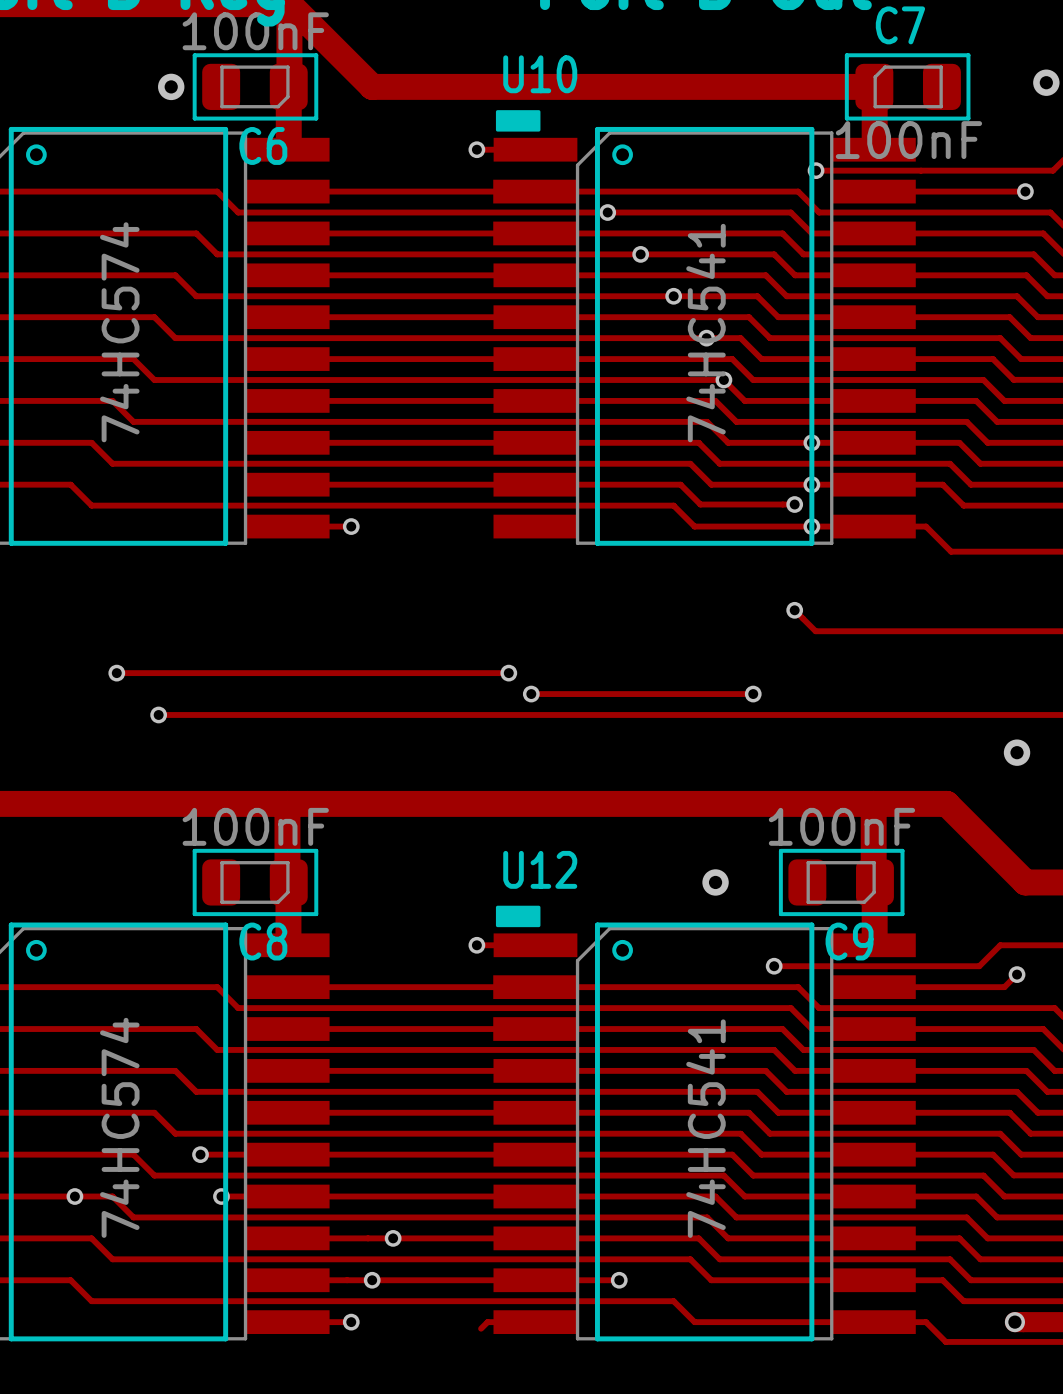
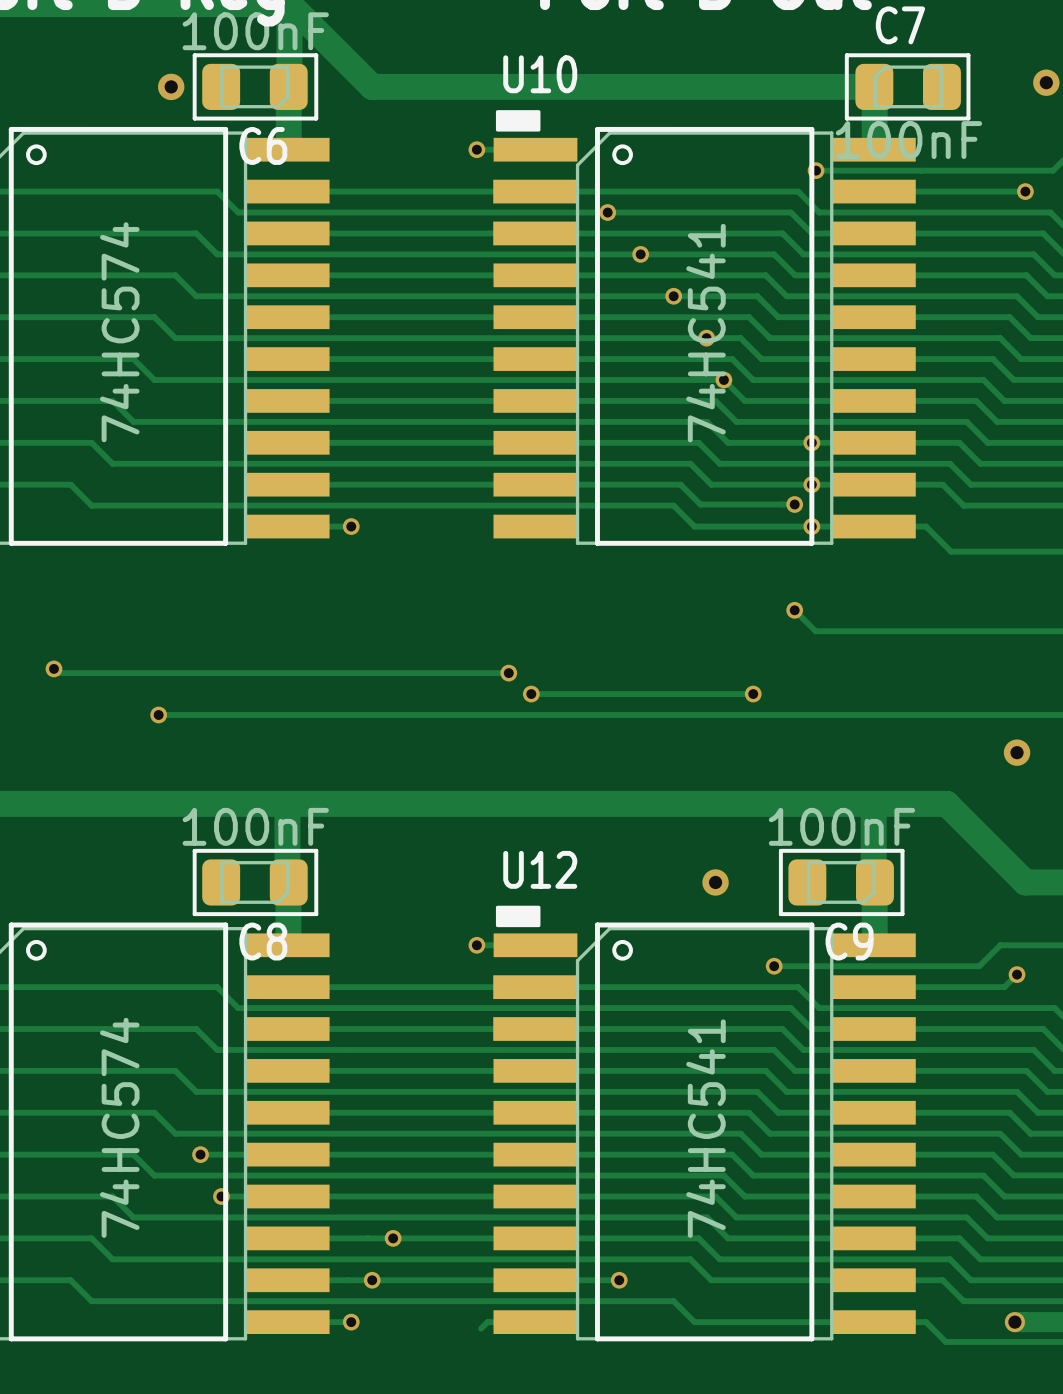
track: none -> (53, 668) (58, 673) (116, 673)
via position: (116, 673) -> (53, 668)
via: (74, 1196) -> none

